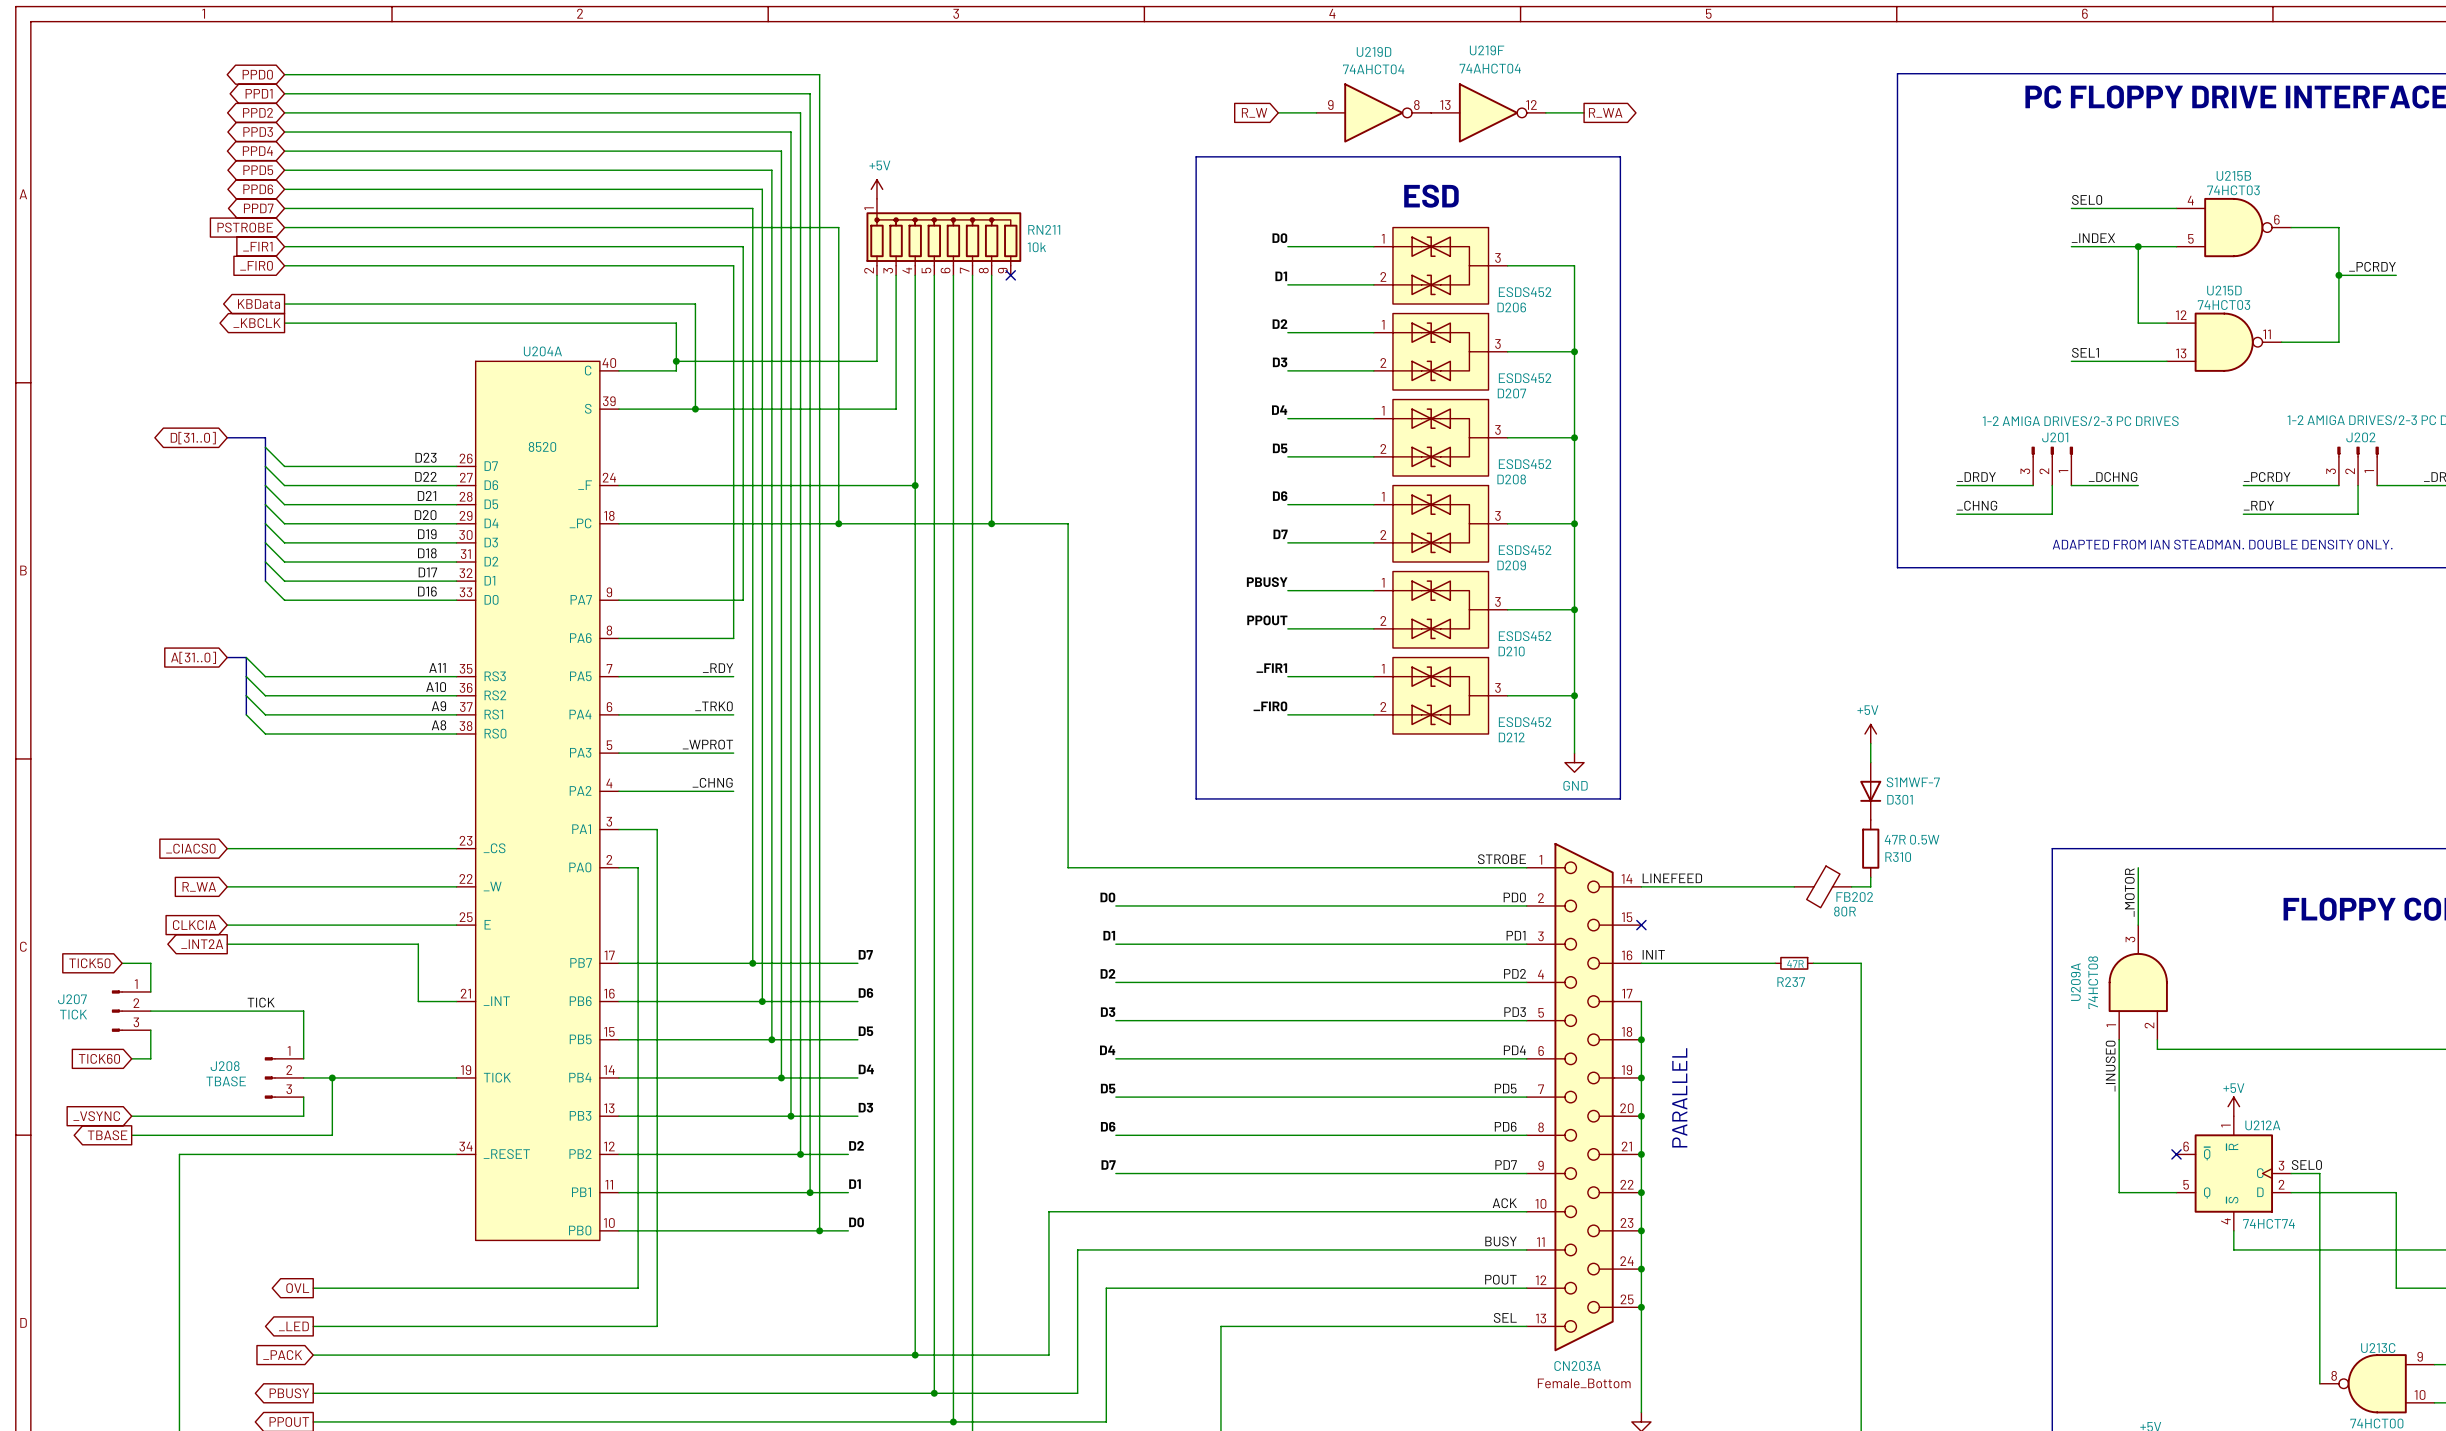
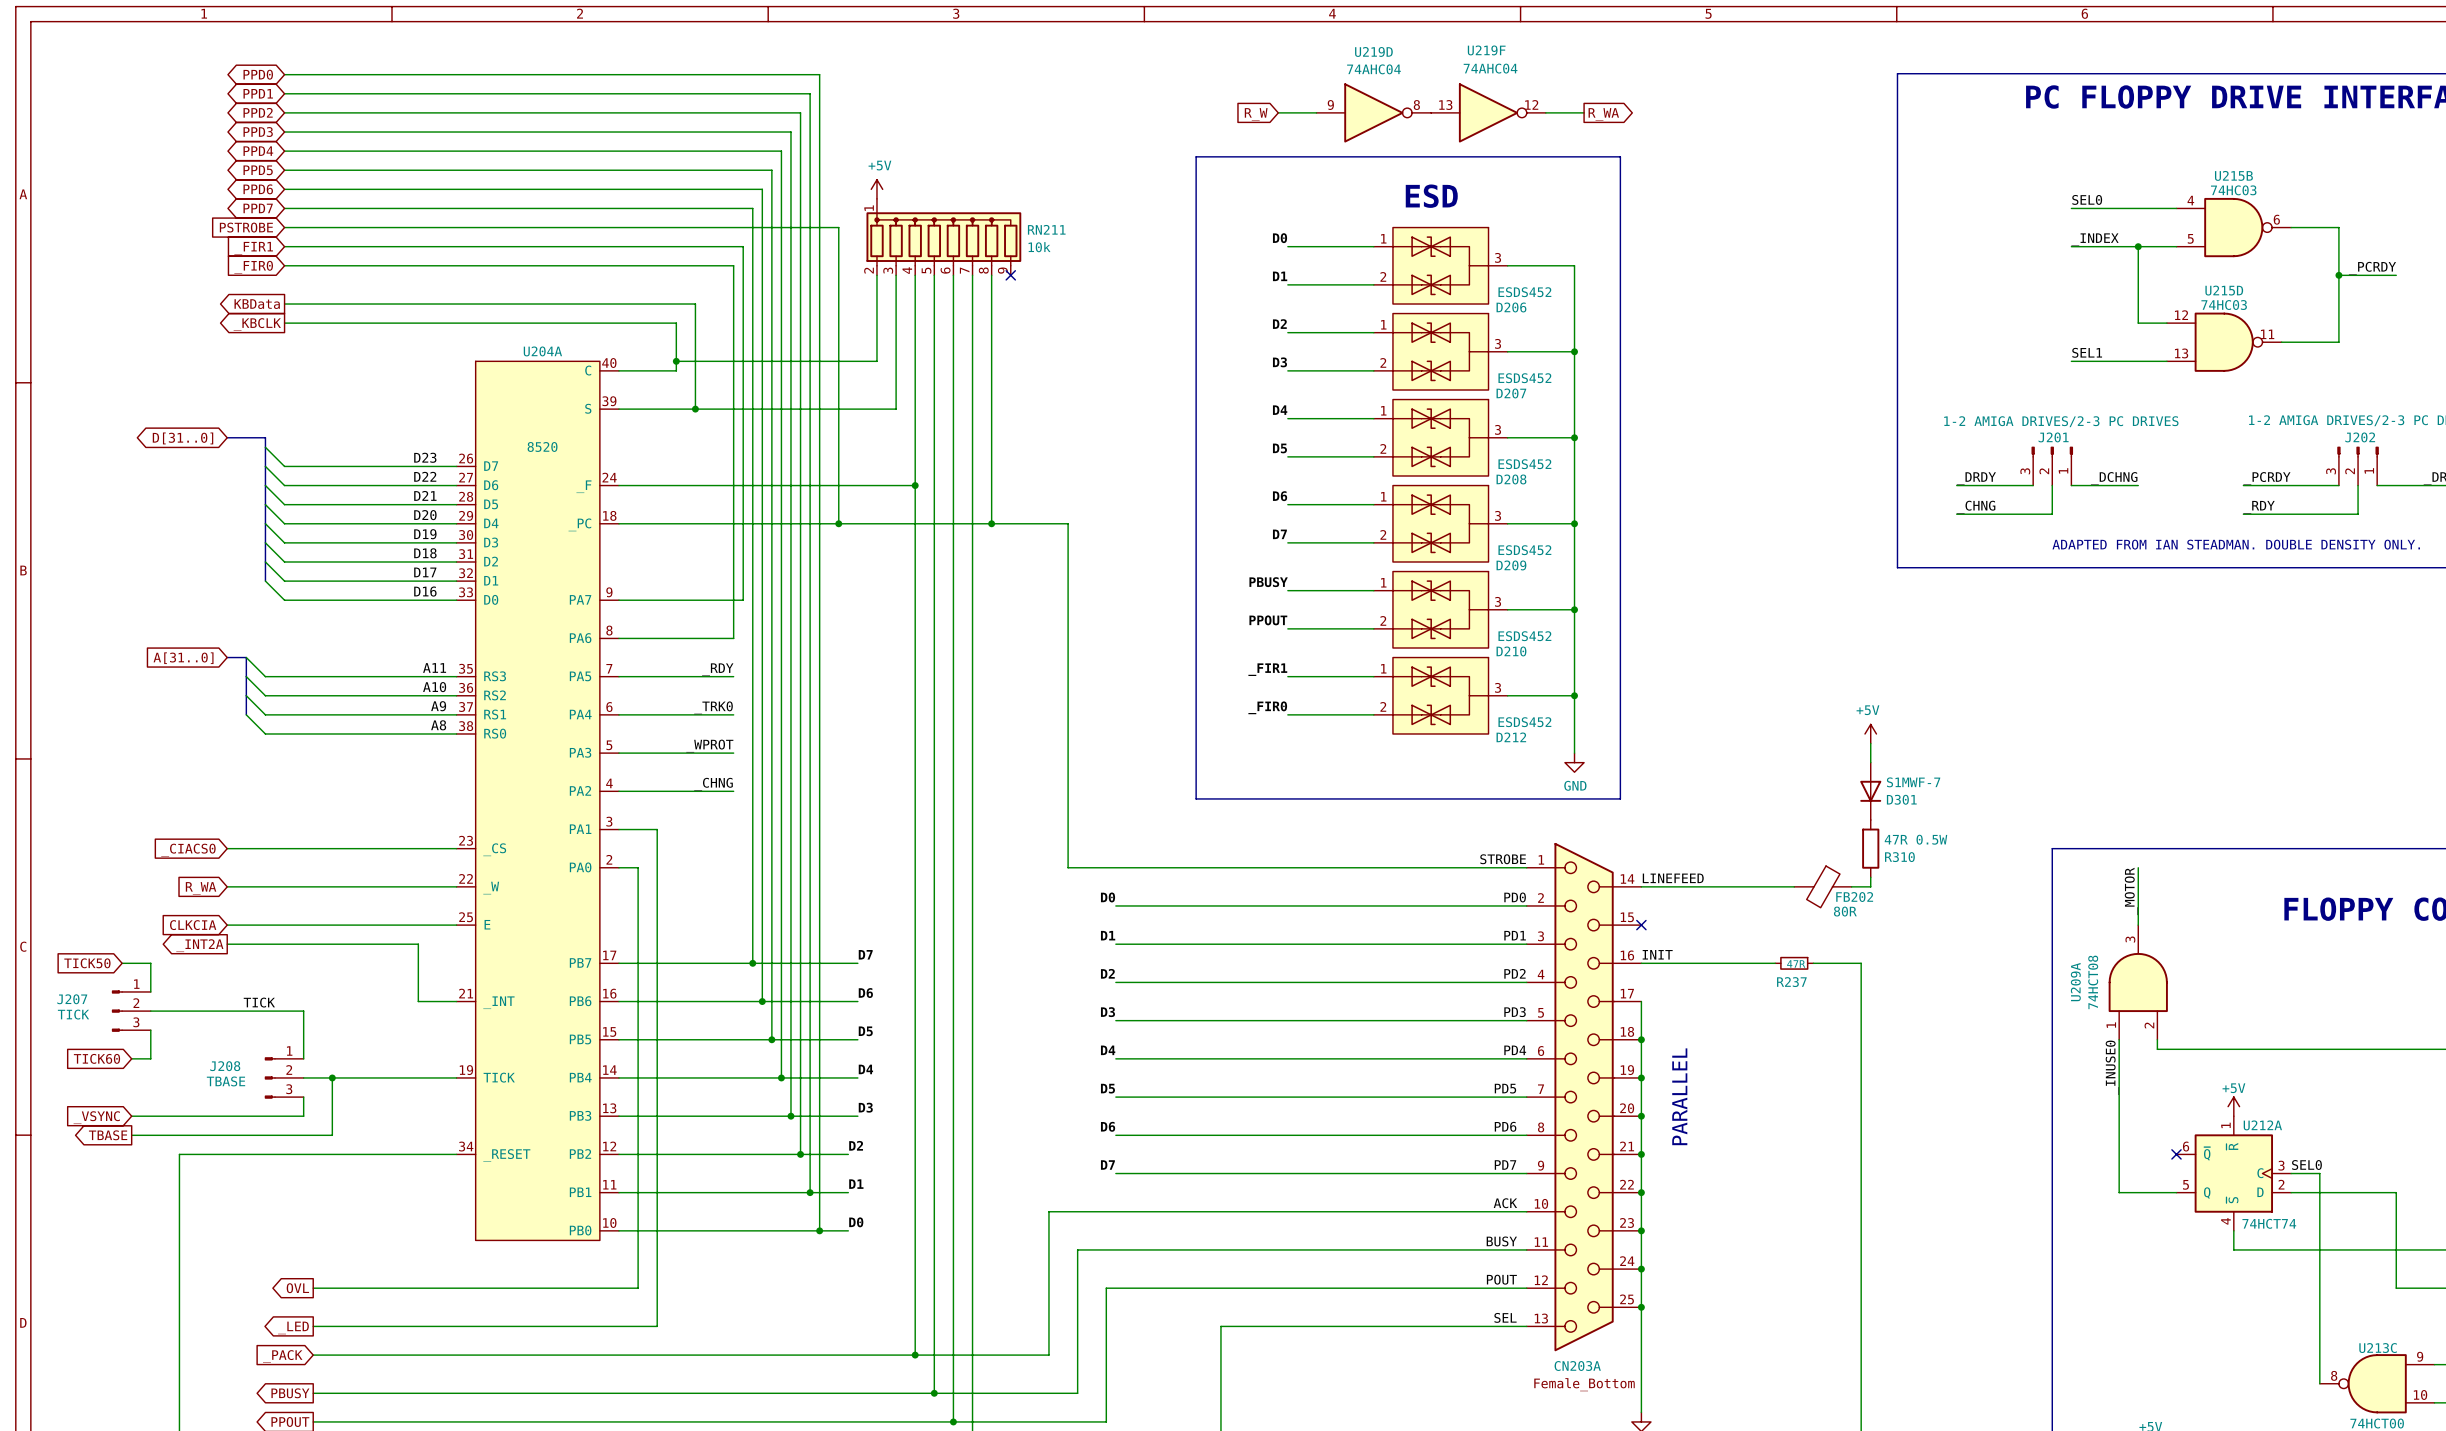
U219F value: 74AHCT04 (1490, 68) -> 74AHC04 (1490, 68)
U219D value: 74AHCT04 (1373, 69) -> 74AHC04 (1373, 69)
U215B value: 74HCT03 (2233, 190) -> 74HC03 (2233, 190)
U215D value: 74HCT03 (2224, 305) -> 74HC03 (2224, 305)

